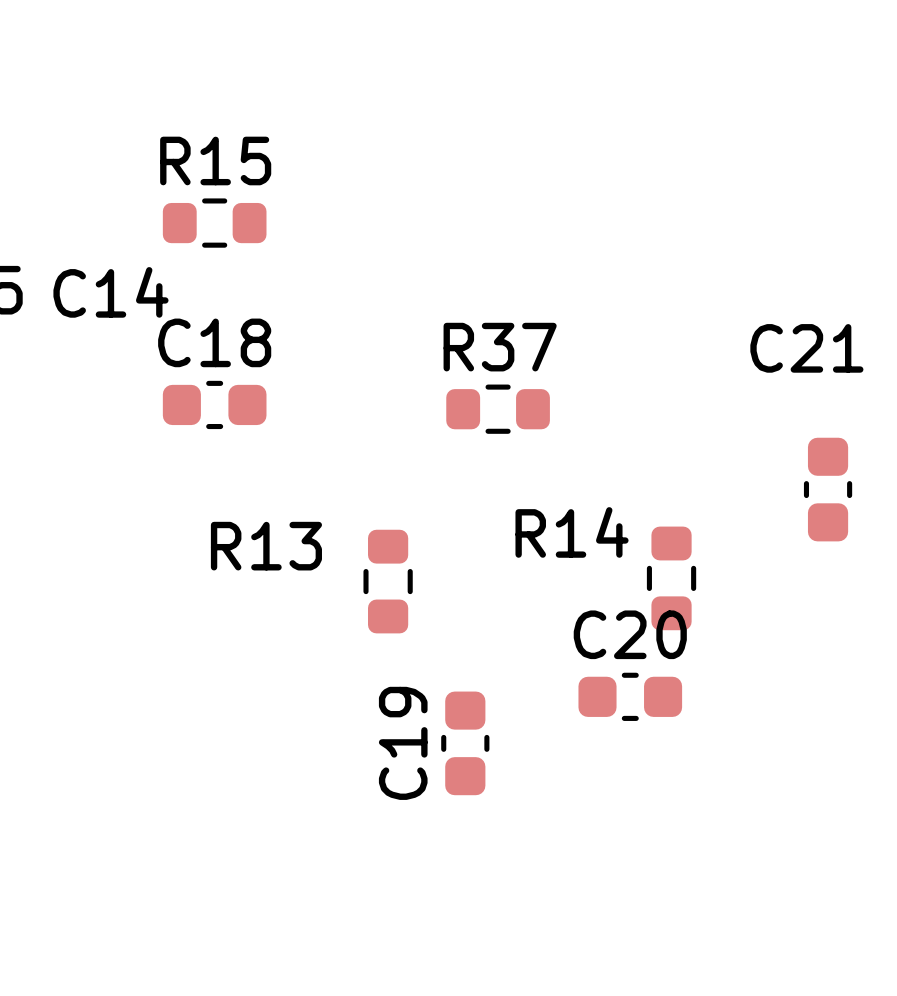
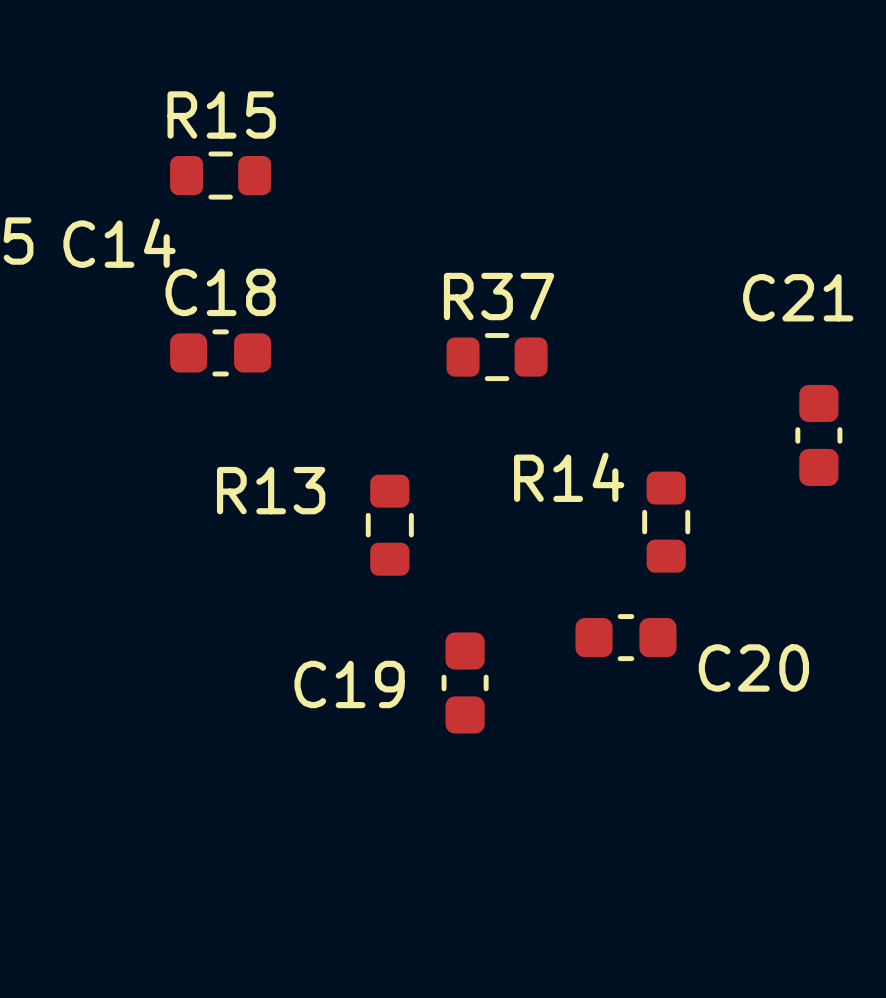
C20 name position: C20 (630, 634) -> C20 (753, 667)
C19 name rotation: 0° (403, 743) -> 90° clockwise (349, 684)

